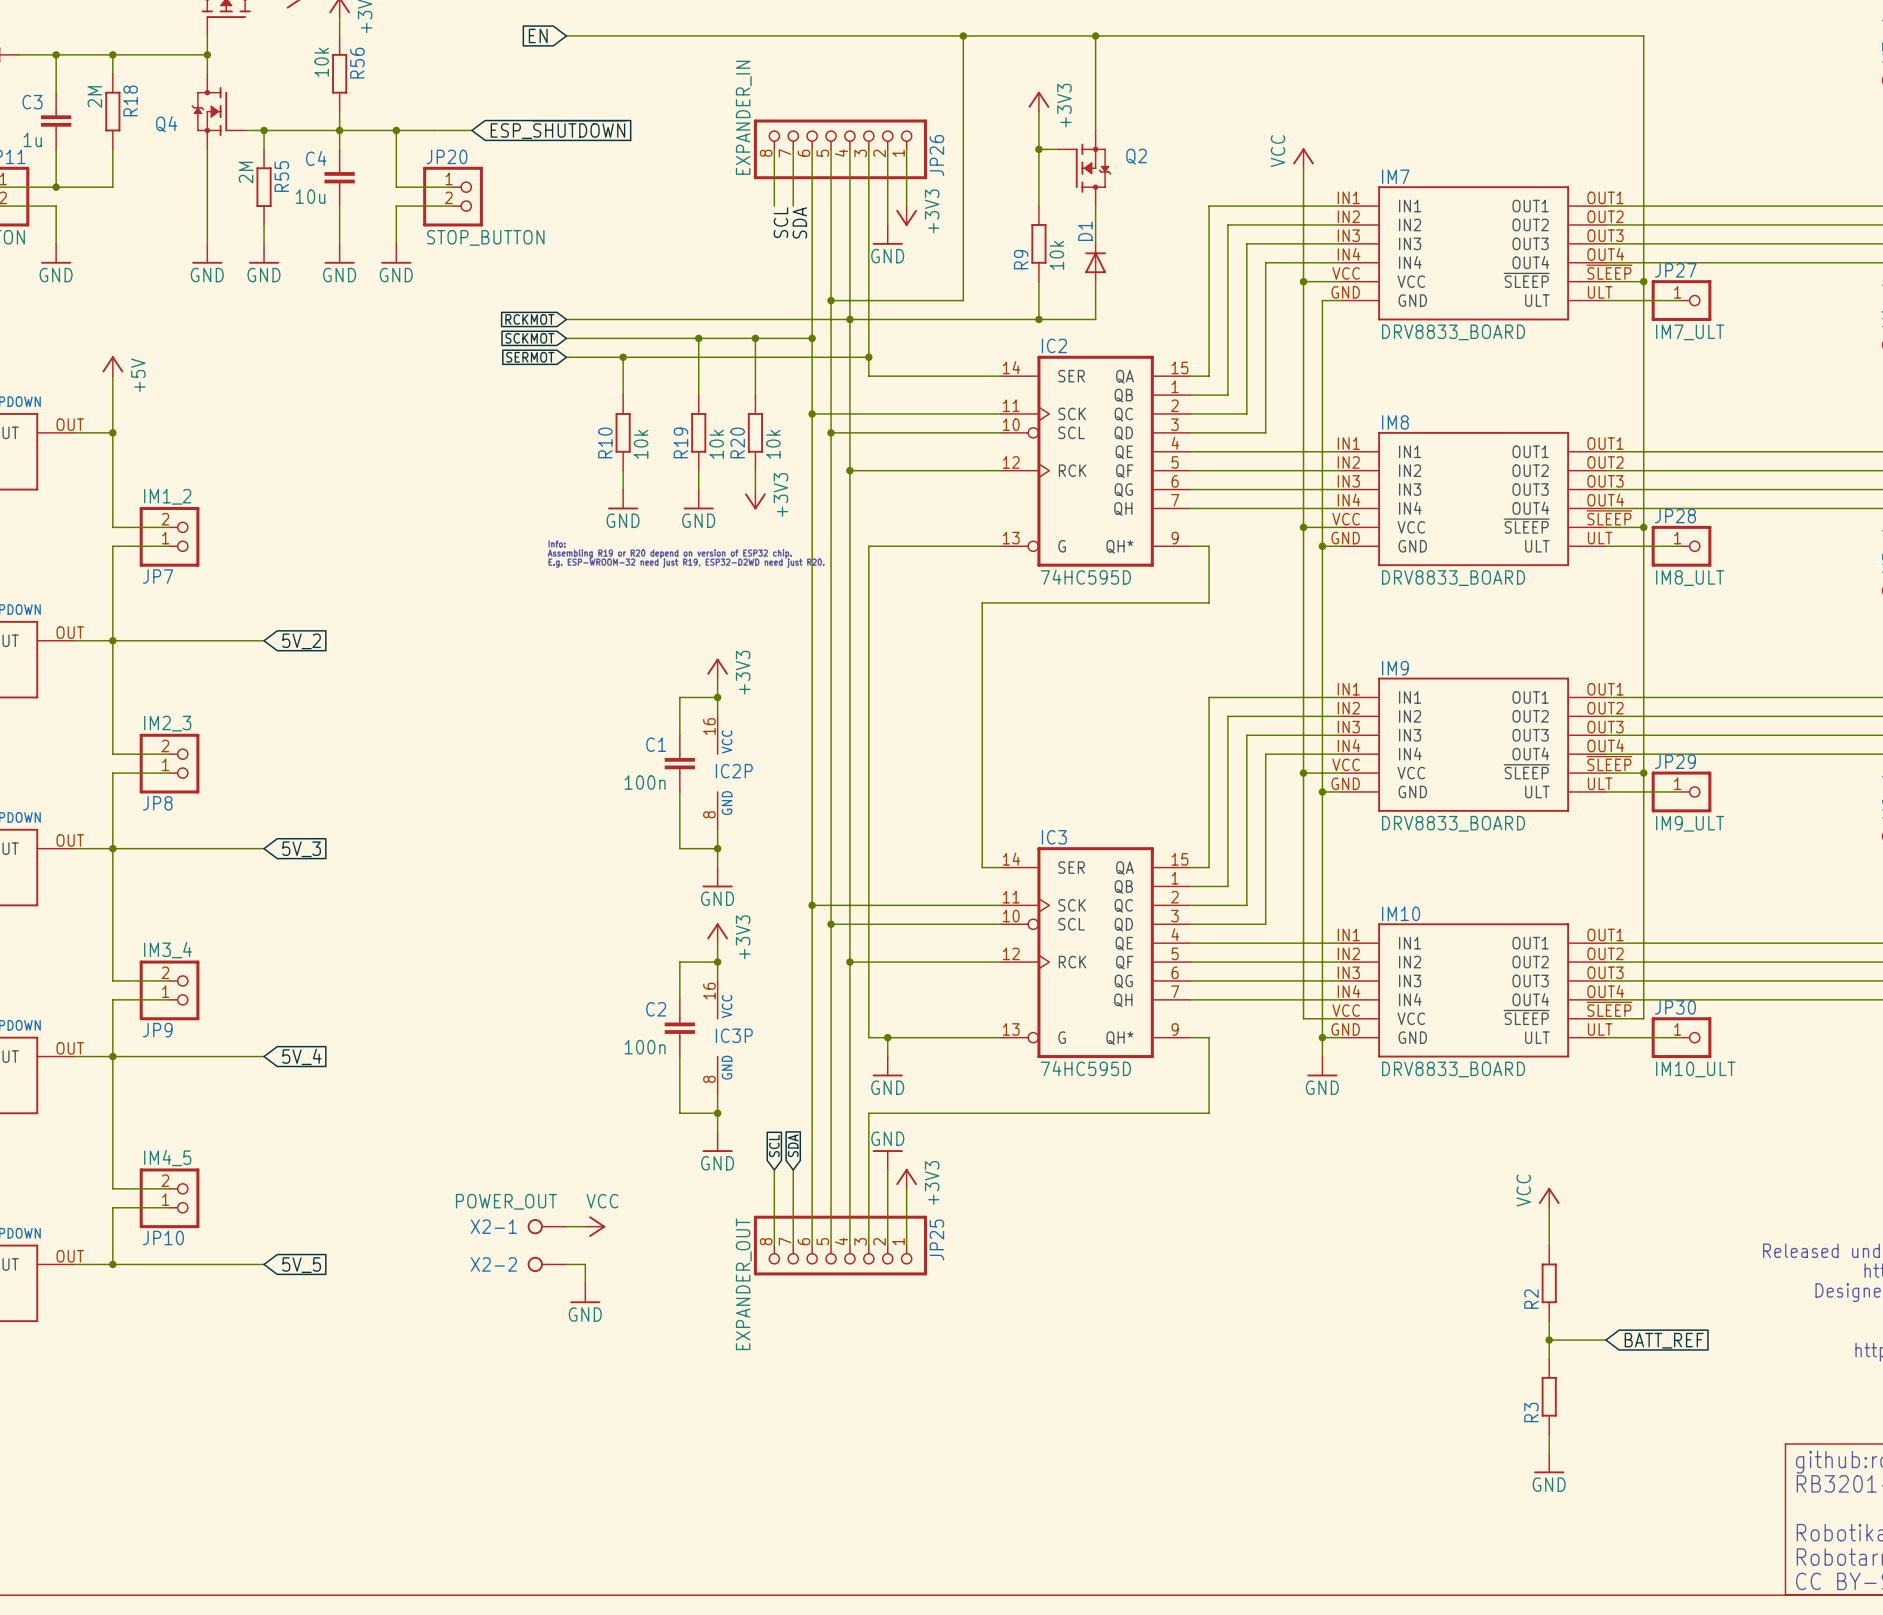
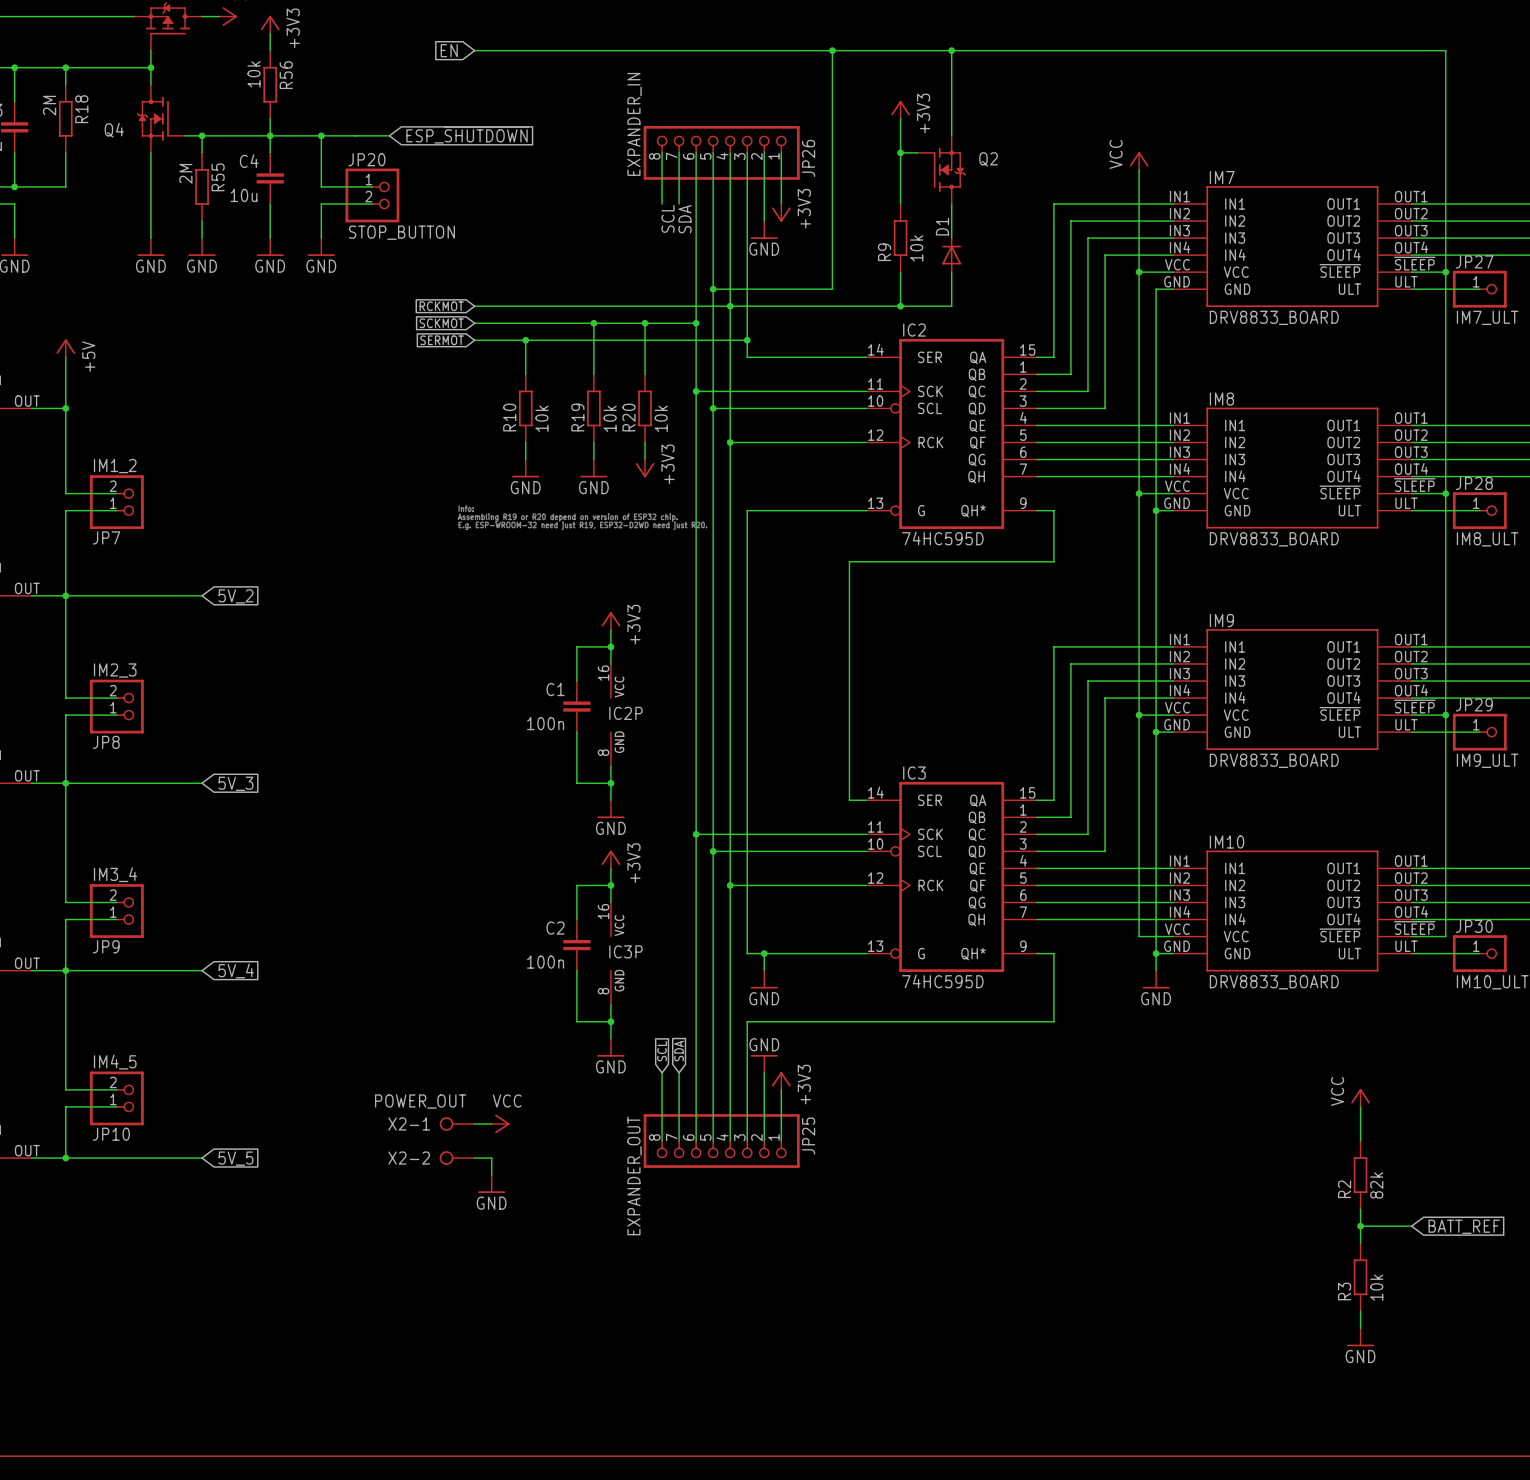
R2 value: none -> 82k (1376, 1185)
R3 value: none -> 10k (1376, 1287)

